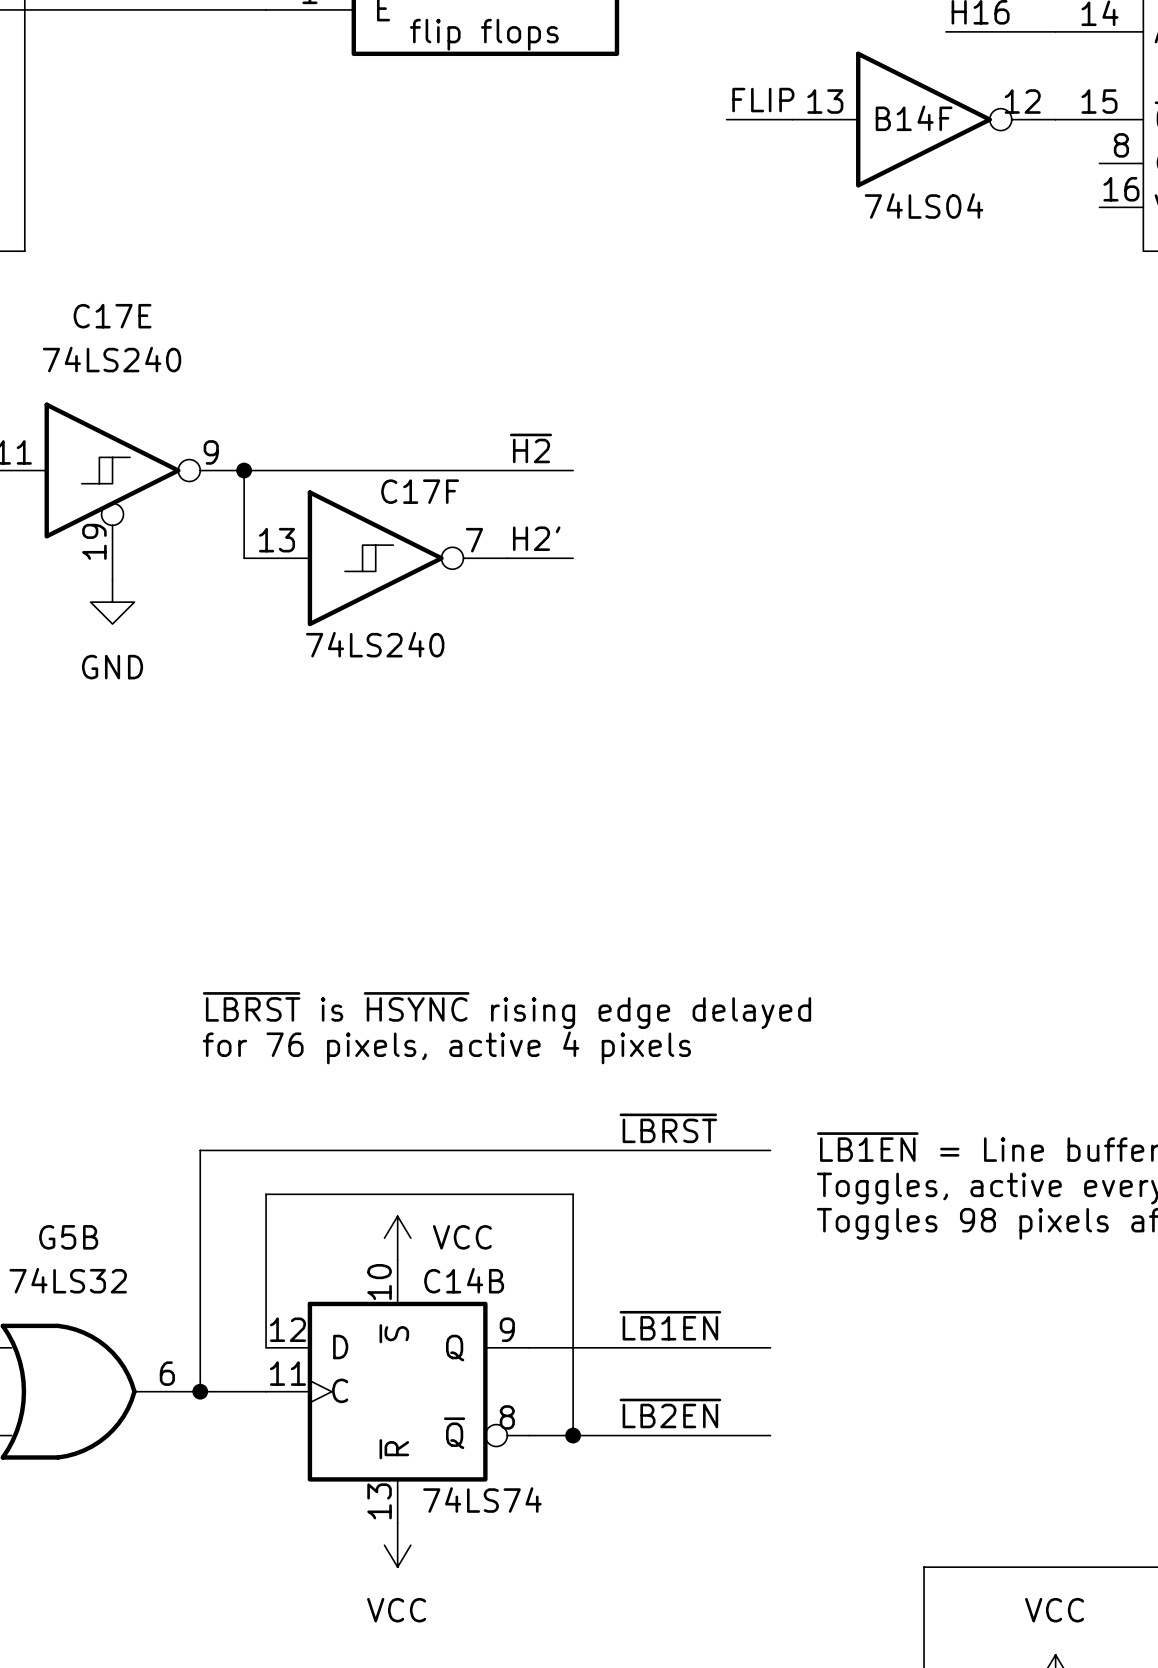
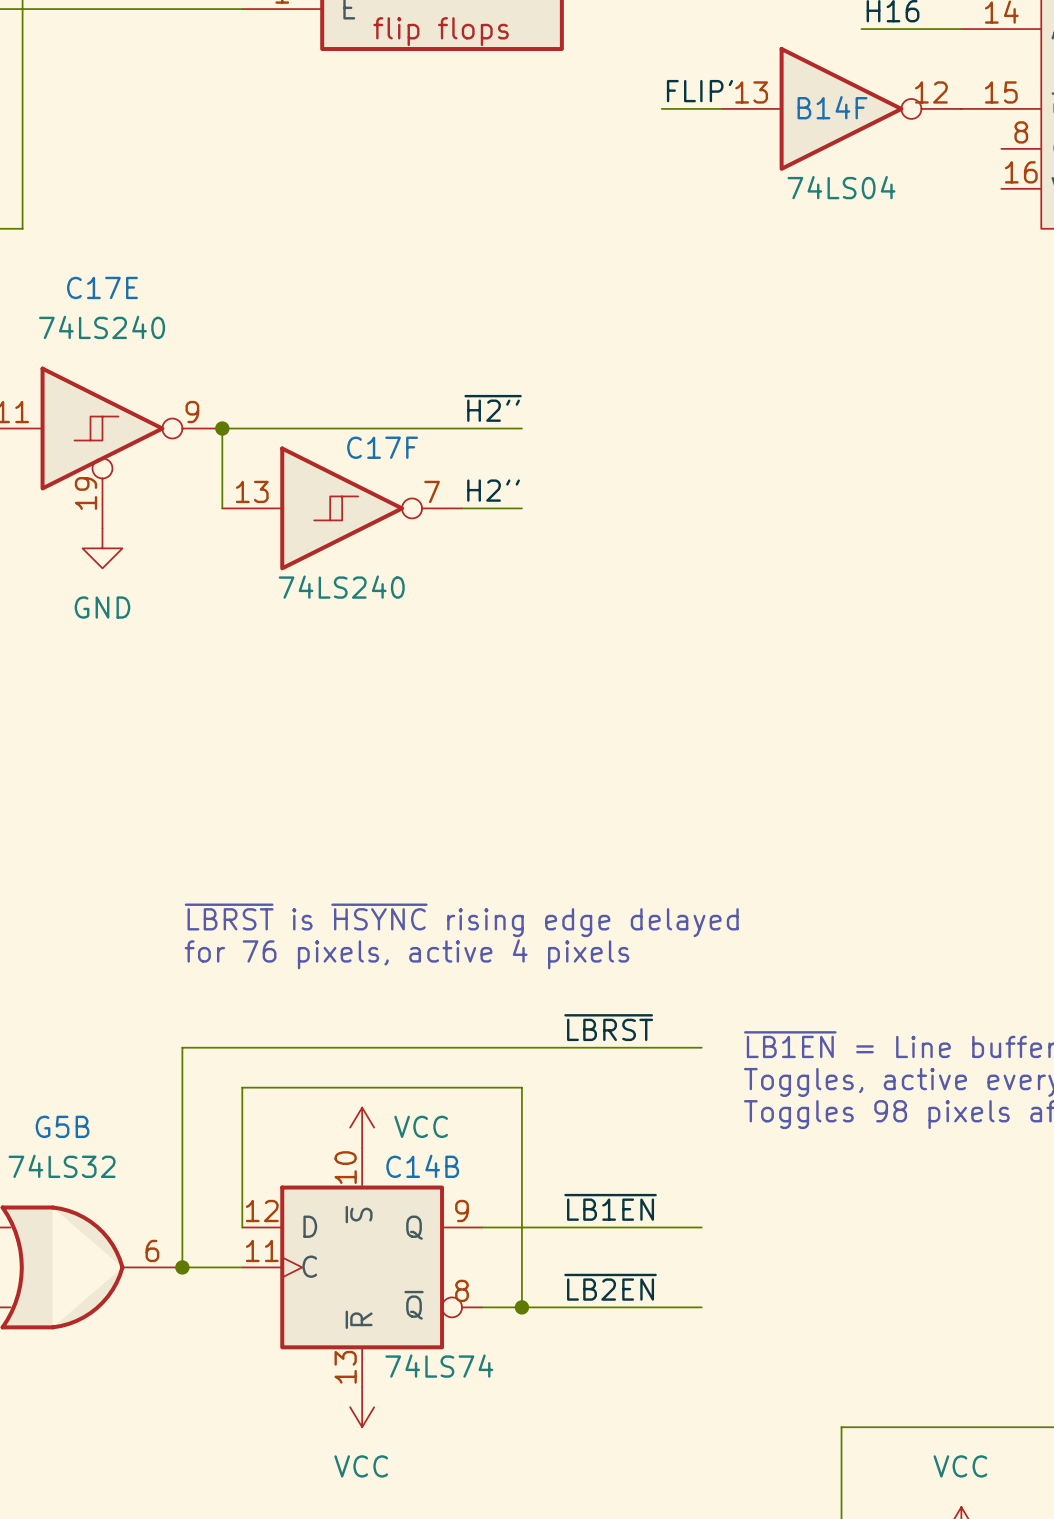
label: FLIP (763, 100) -> FLIP' (699, 91)
label: ~{H2} (530, 448) -> ~{H2''} (493, 408)
label: H2' (536, 538) -> H2'' (493, 490)

